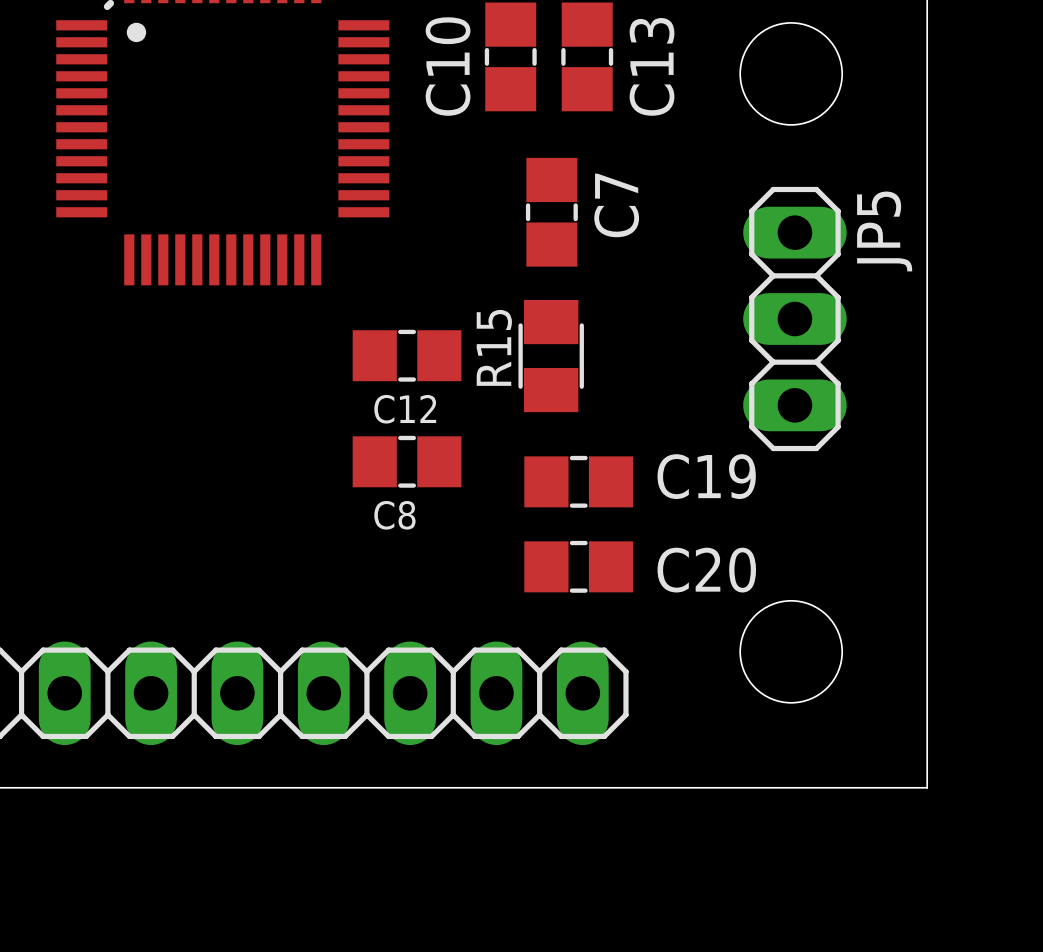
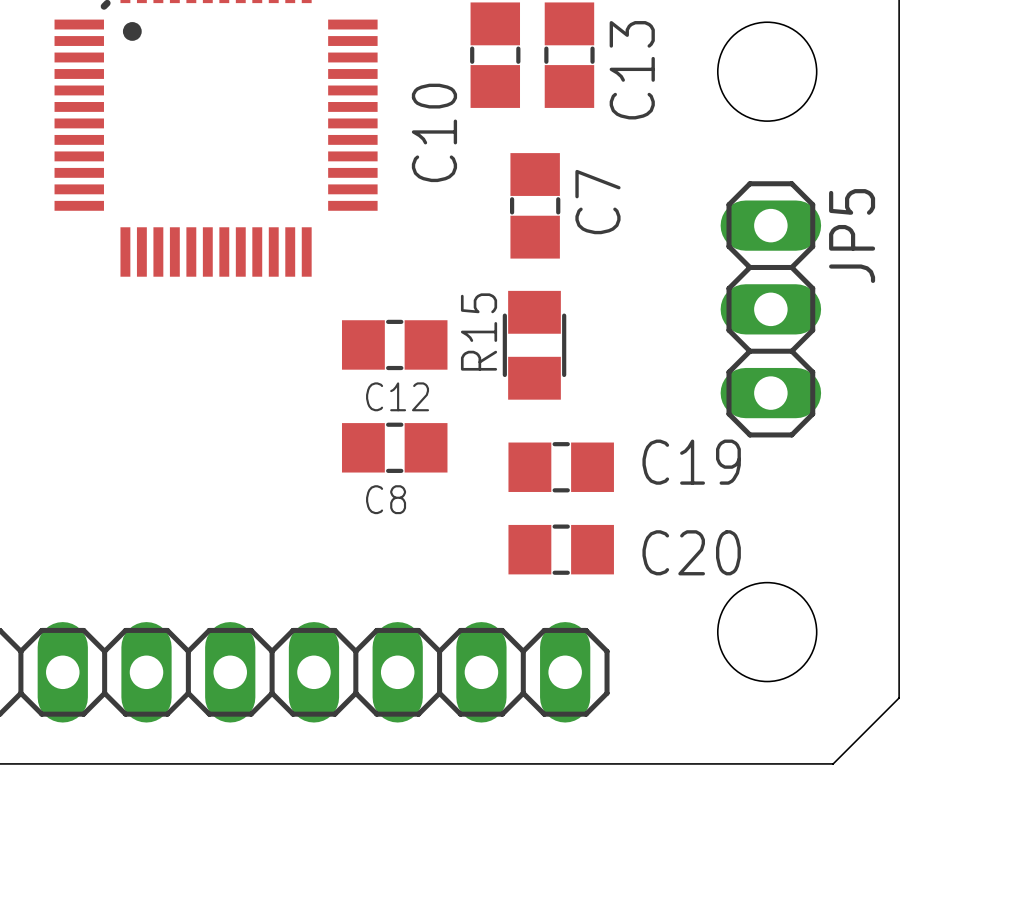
C10 name position: C10 (448, 66) -> C10 (434, 132)
board edge: (927, 719) (927, 787) (859, 787) -> (899, 698) (833, 763)

